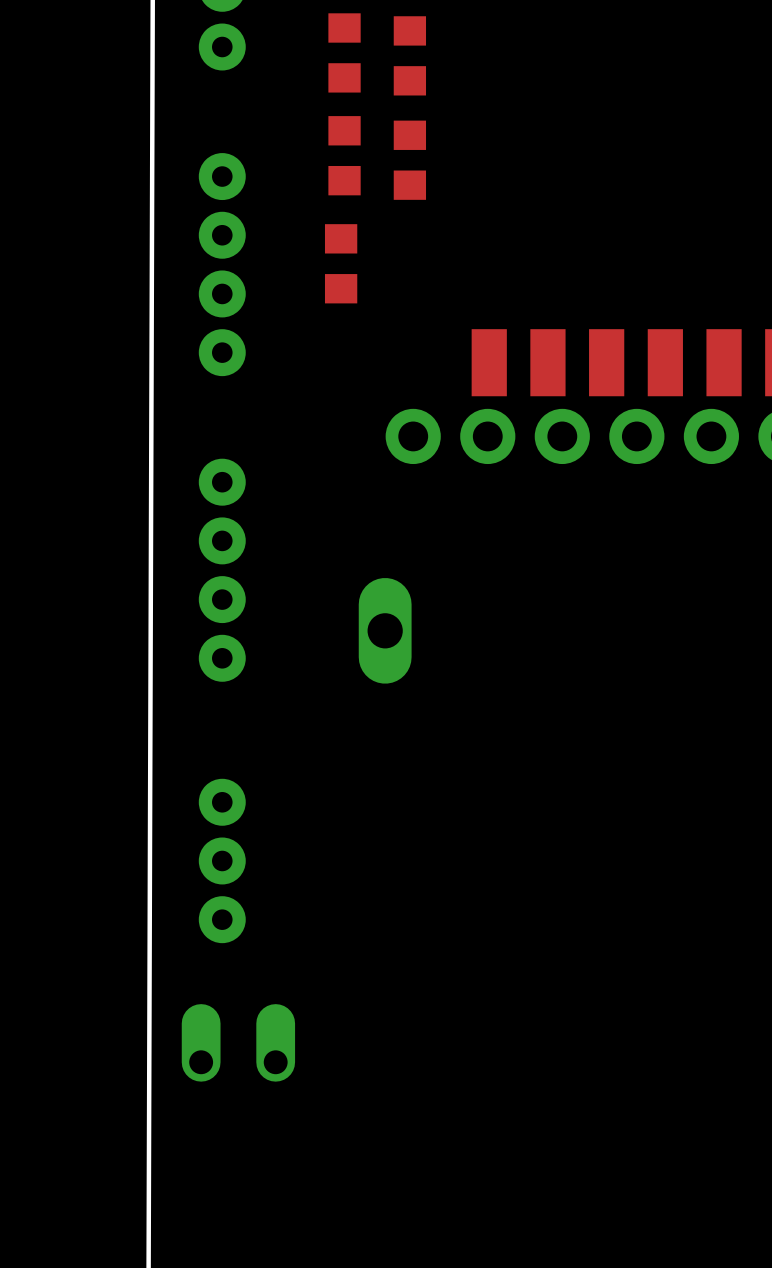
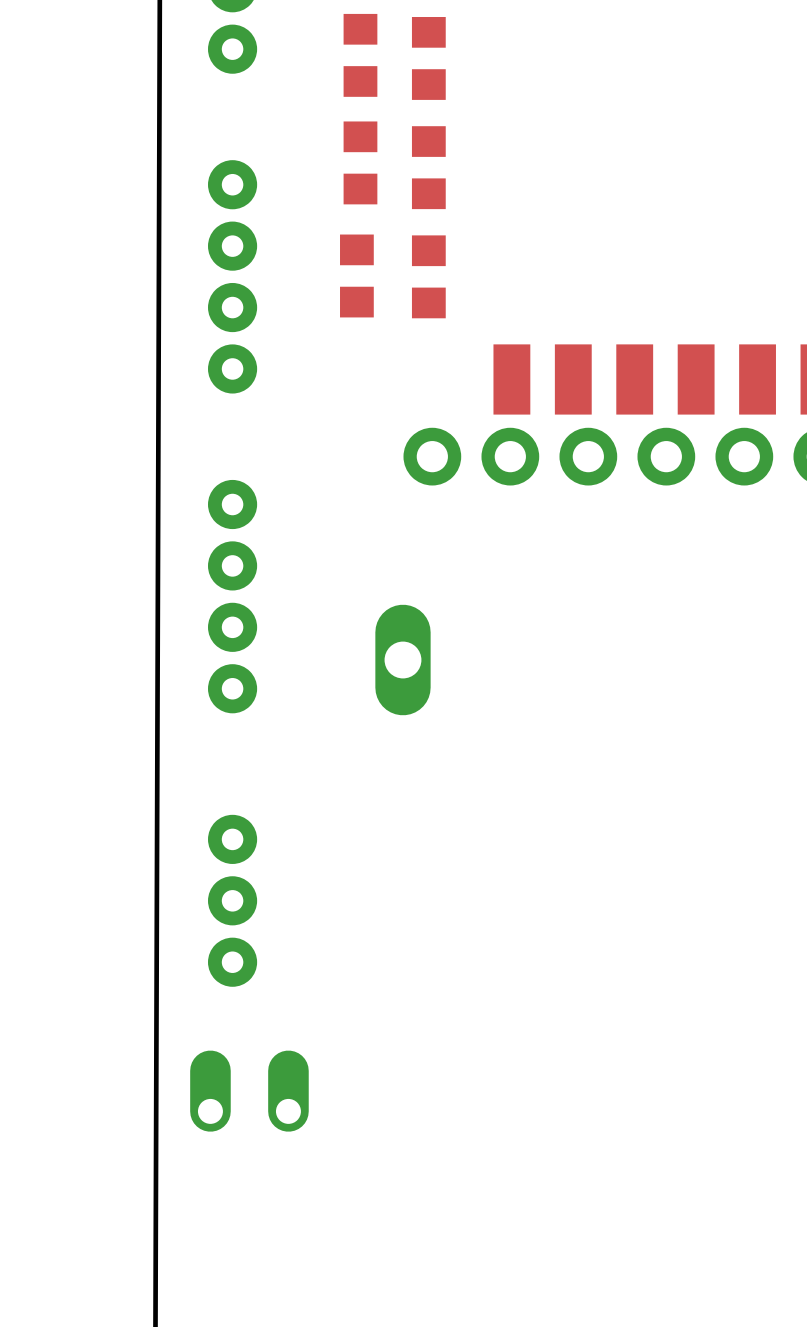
part: none -> (428, 276)

